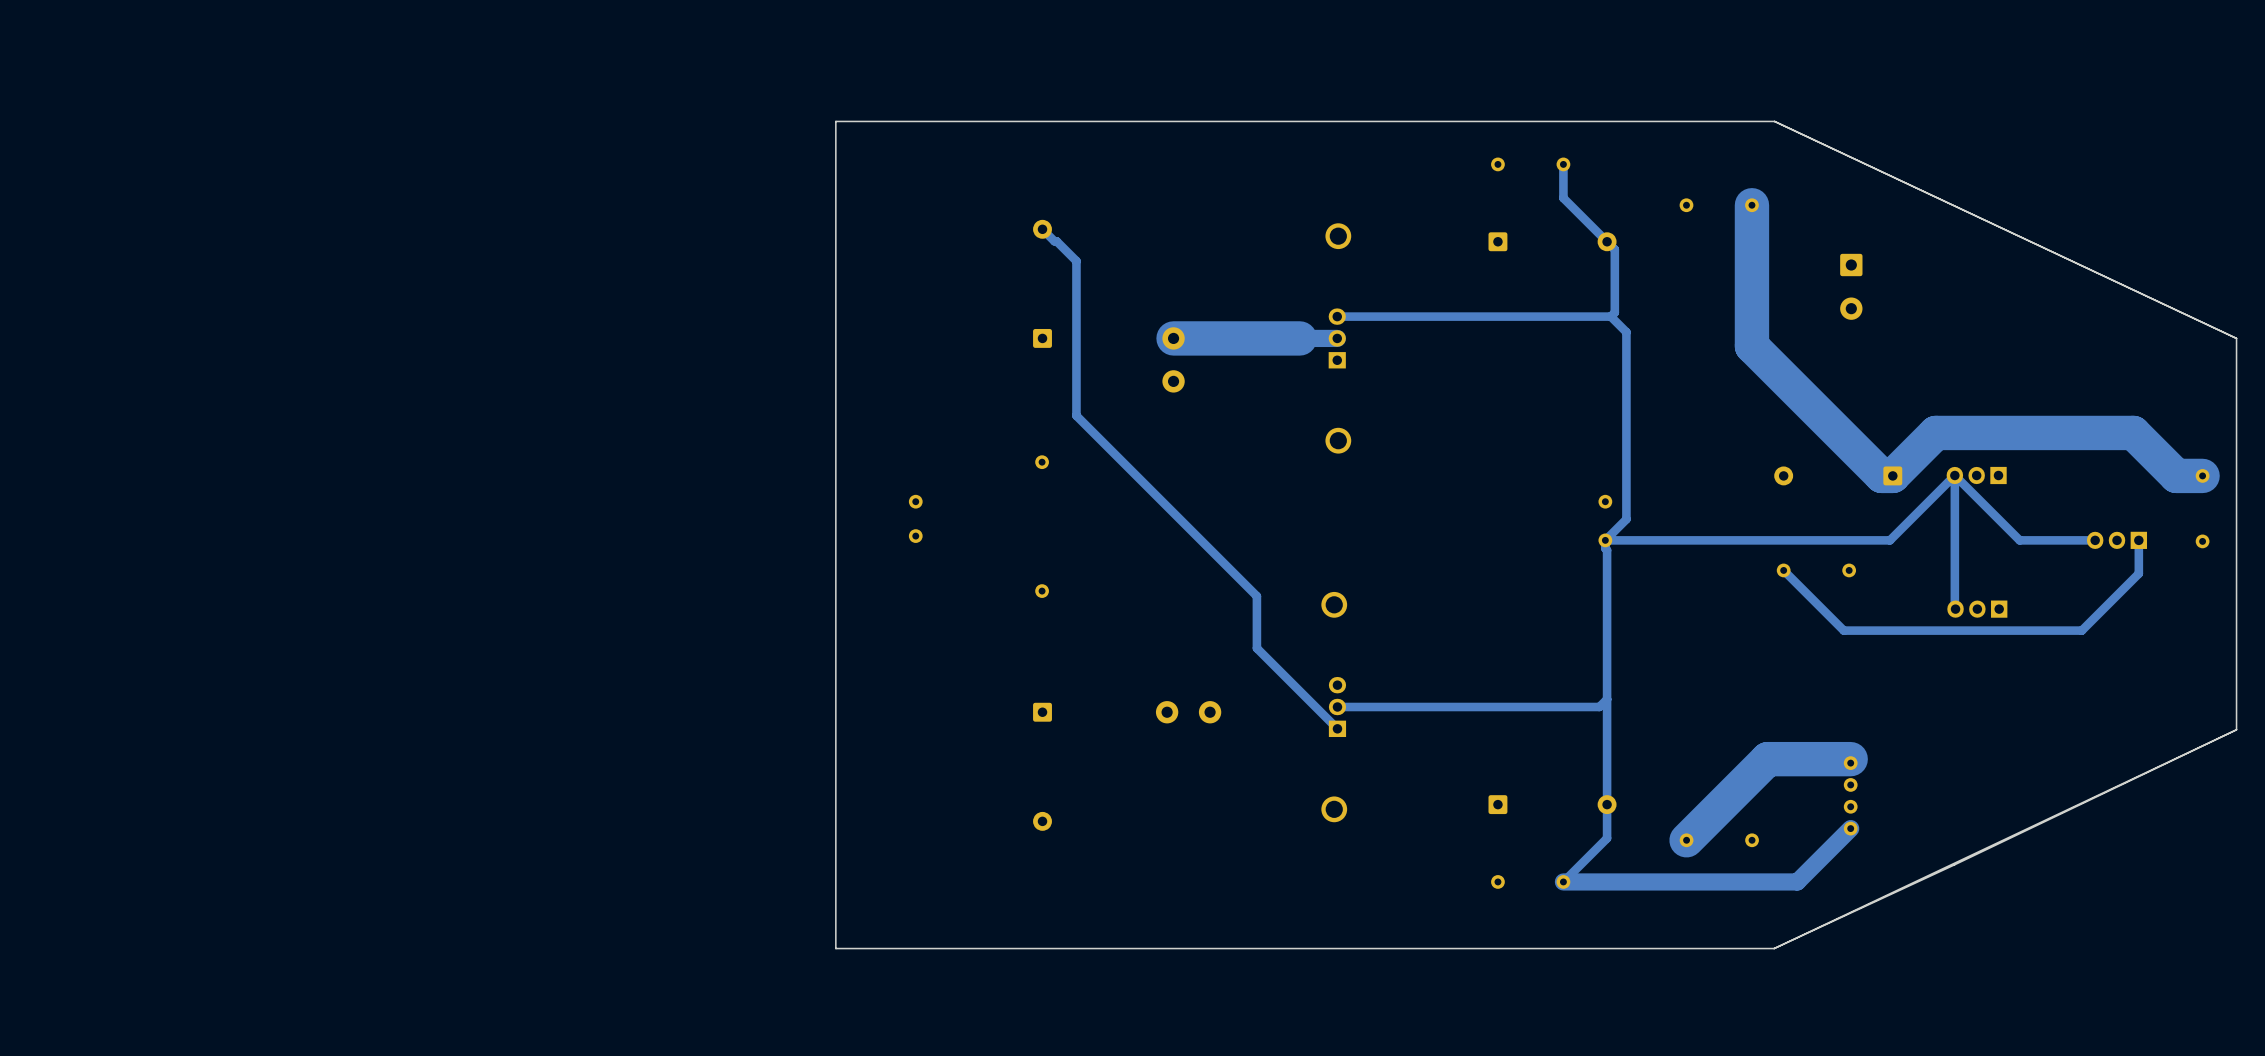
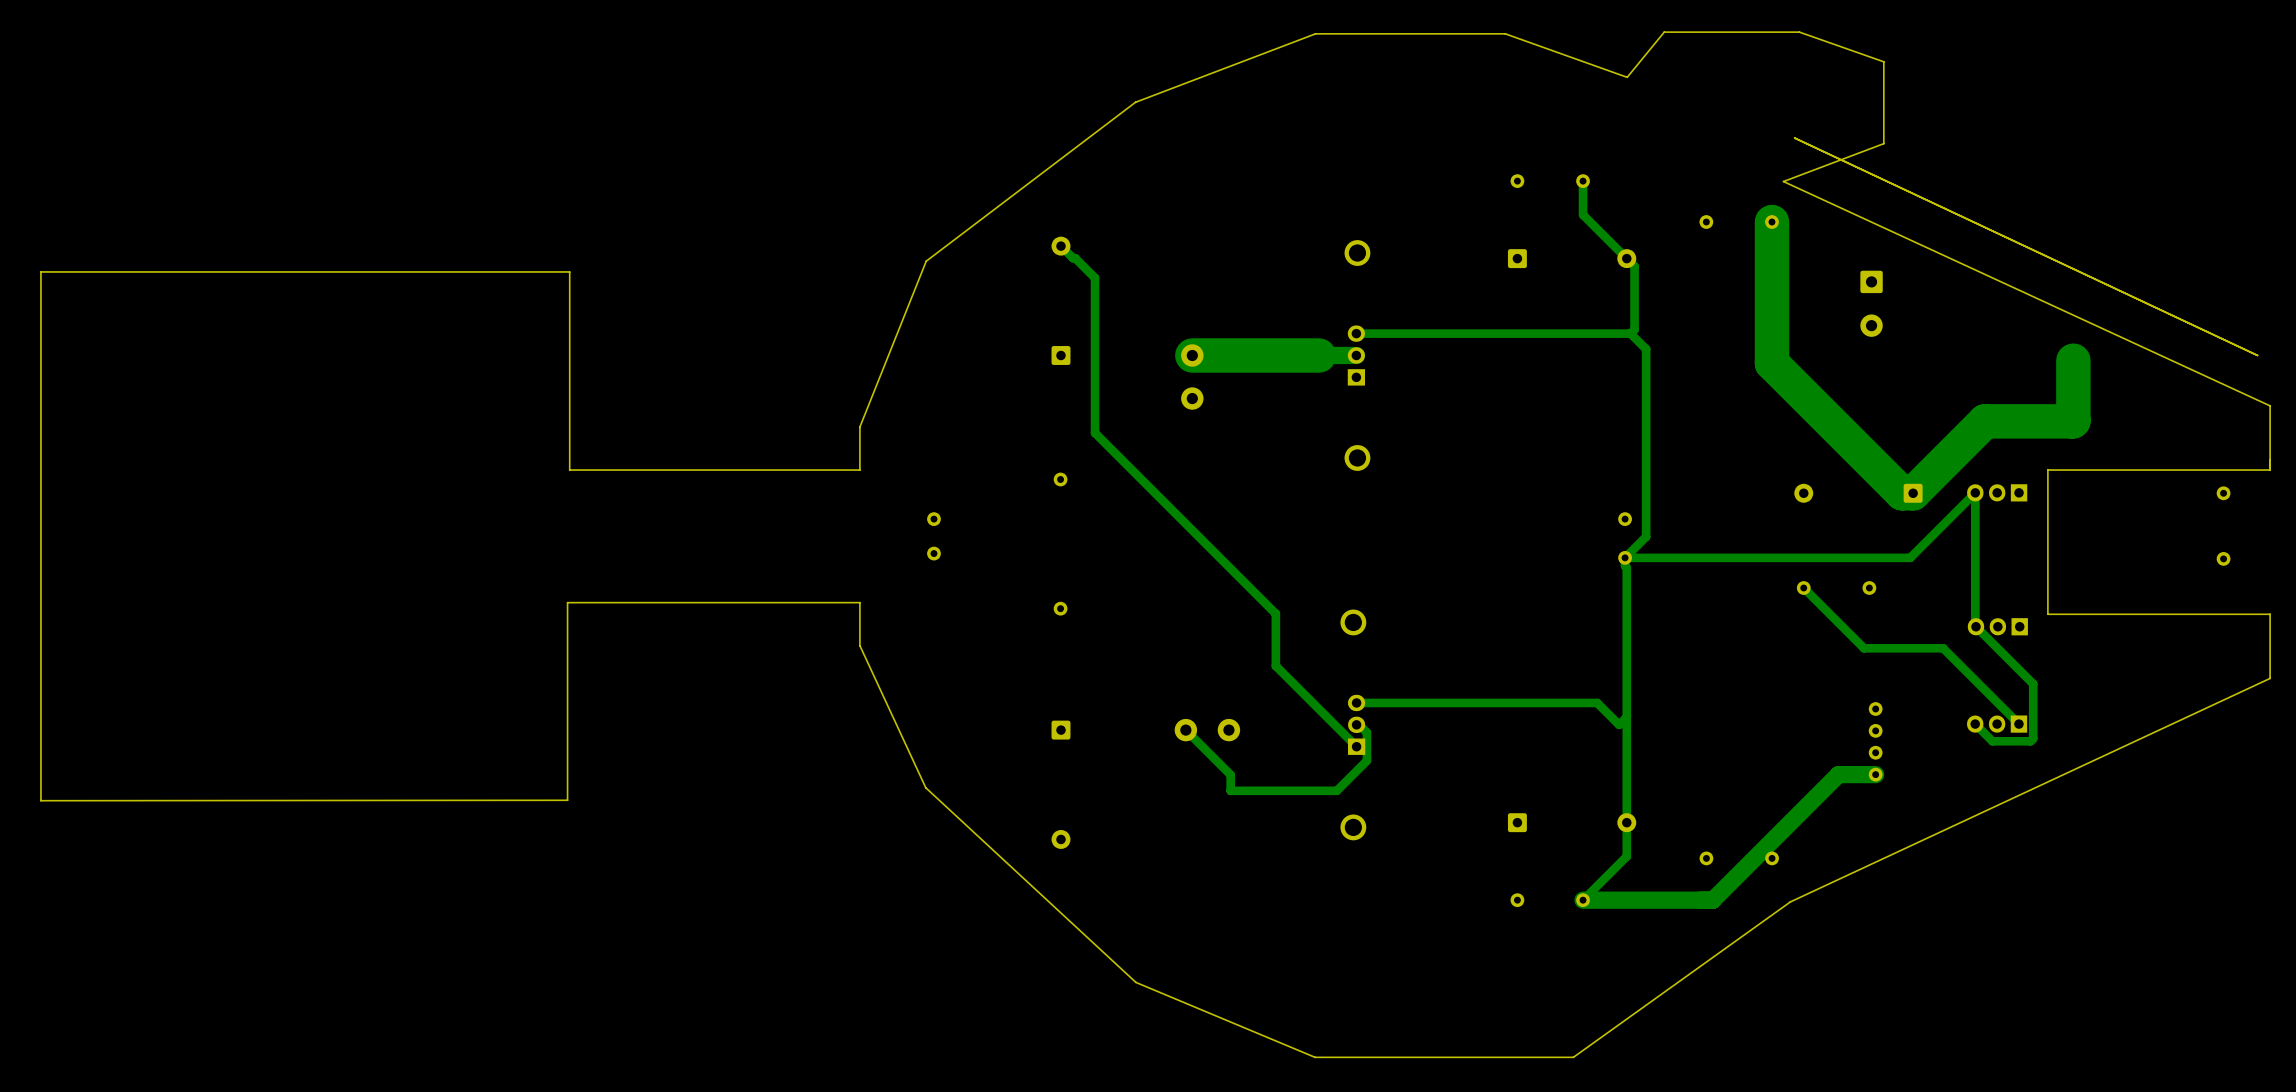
board edge: none -> (1799, 32) (1883, 61) (1883, 143) (1783, 181) (2270, 405) (2270, 470) (2047, 470) (2047, 614) (2270, 614) (2270, 678) (1790, 901) (1573, 1057) (1315, 1057) (1135, 982) (925, 787) (859, 645) (859, 602) (567, 602) (567, 800) (40, 800) (40, 271) (569, 271) (569, 470) (859, 470) (859, 426) (926, 261) (1135, 102) (1315, 33) (1505, 33) (1627, 77) (1664, 32) (1799, 32)
board edge: (1774, 121) (835, 121) (835, 948) (1774, 948) -> none
board edge: (2236, 338) (2236, 729) -> none
track: (1935, 432) (2133, 432) (2176, 475) (2202, 475) -> (1956, 450) (1985, 421) (2072, 421) (2073, 360)
track: (1954, 475) (2019, 540) (2095, 540) -> none
part: (2117, 540) -> none
track: (2138, 540) (2138, 573) (2081, 630) (1922, 630) -> (2018, 724) (1943, 648)
track: none -> (1975, 626) (2033, 683) (2033, 738) (2030, 741) (1992, 741) (1975, 724)
track: none -> (1359, 724) (1366, 732) (1366, 760) (1336, 790) (1230, 790) (1230, 774) (1185, 730)
track: (1599, 706) (1339, 706) -> (1619, 724) (1597, 702) (1352, 702)
part: none -> (1997, 724)
board edge: (2236, 729) (1774, 948) -> none
board edge: (2236, 729) (1774, 948) -> none
track: (1850, 759) (1767, 759) (1686, 840) -> none
part position: (1850, 795) -> (1875, 741)
track: (1850, 828) (1797, 881) (1693, 881) -> (1875, 774) (1838, 774) (1712, 900)

